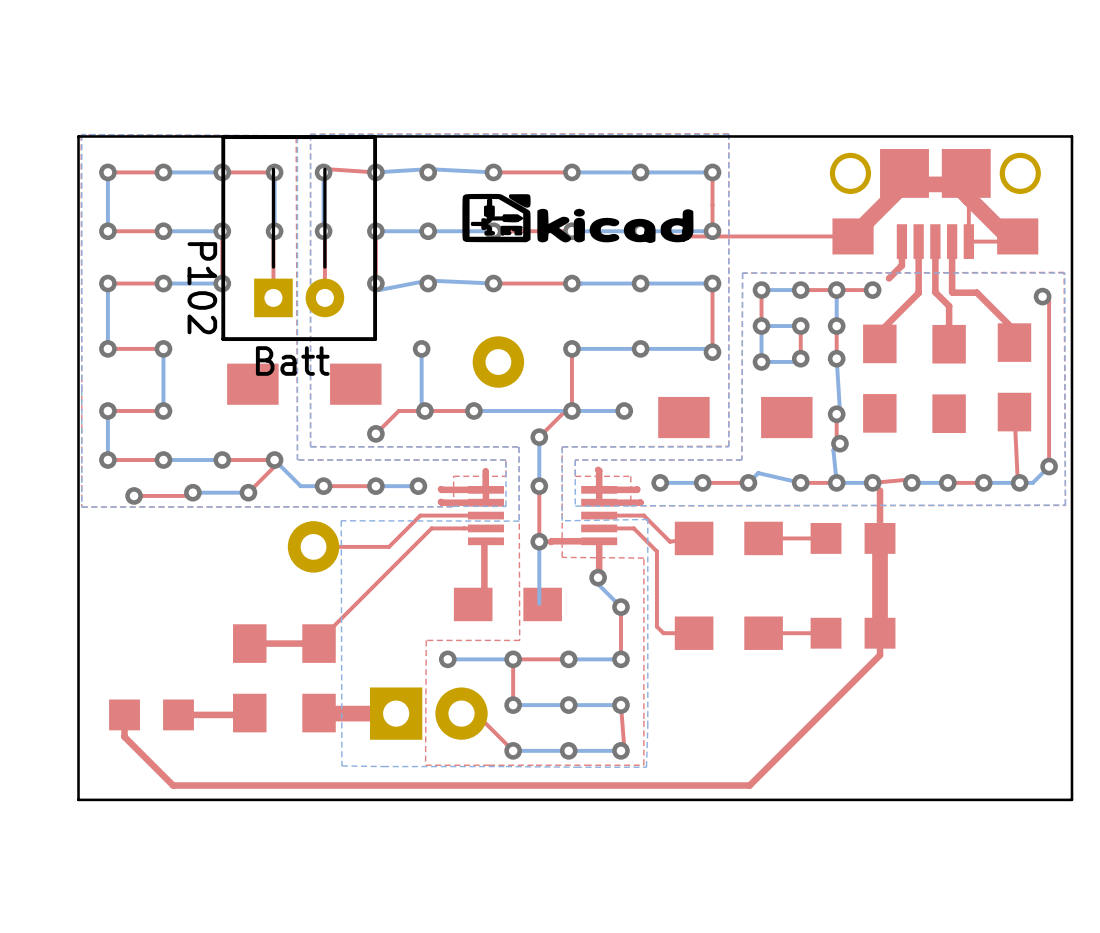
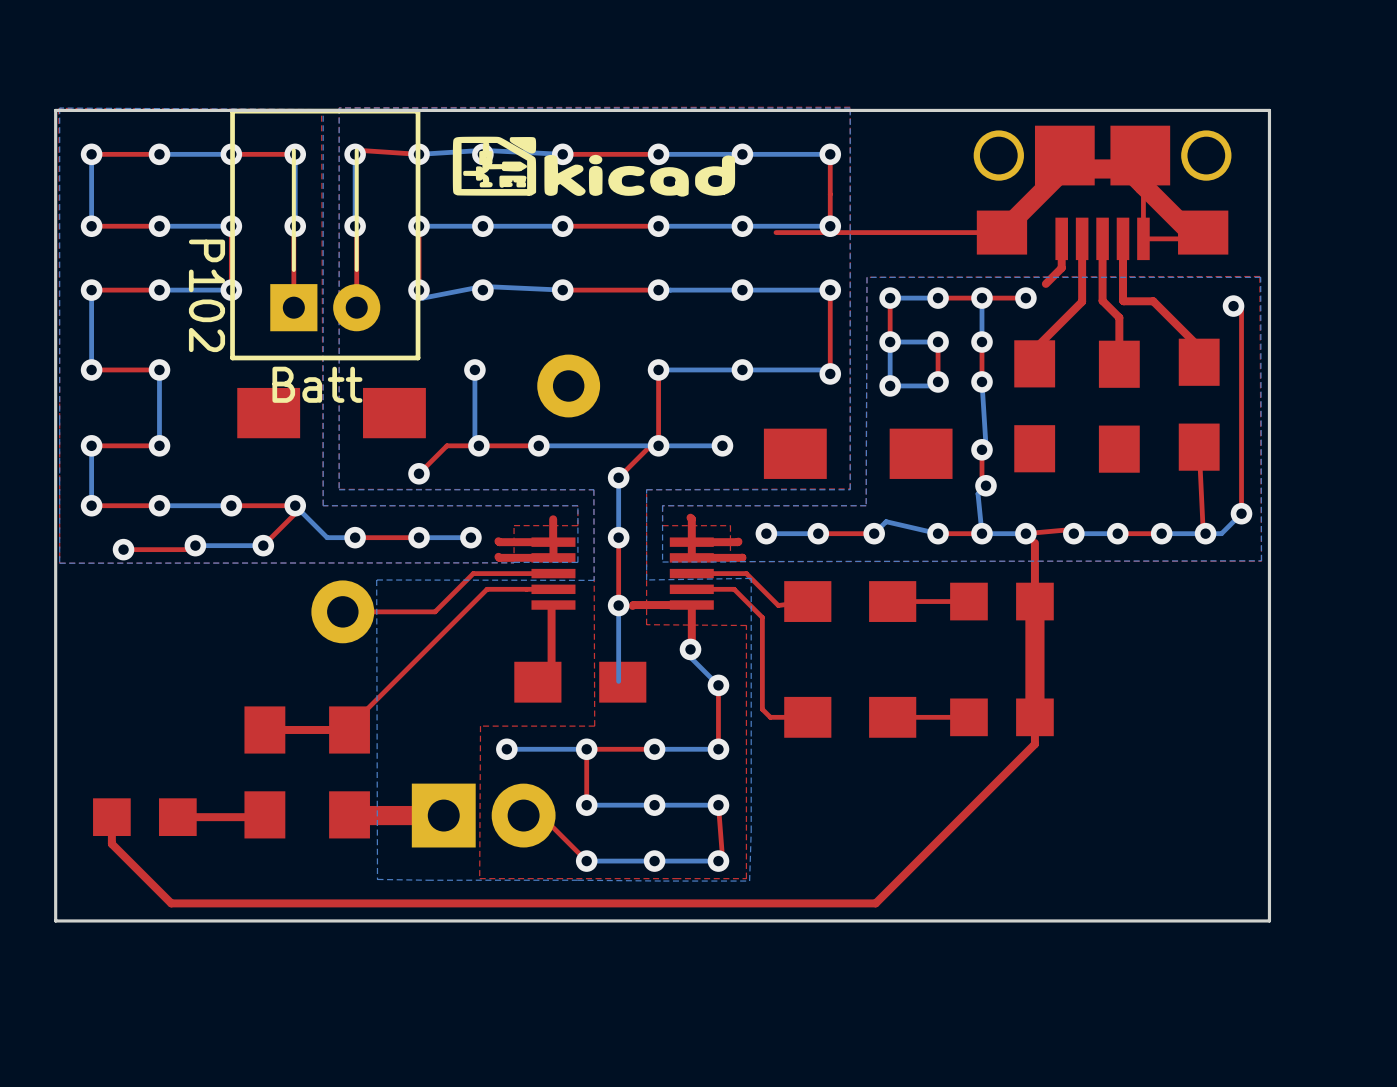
drawing position: (577, 218) -> (593, 166)

